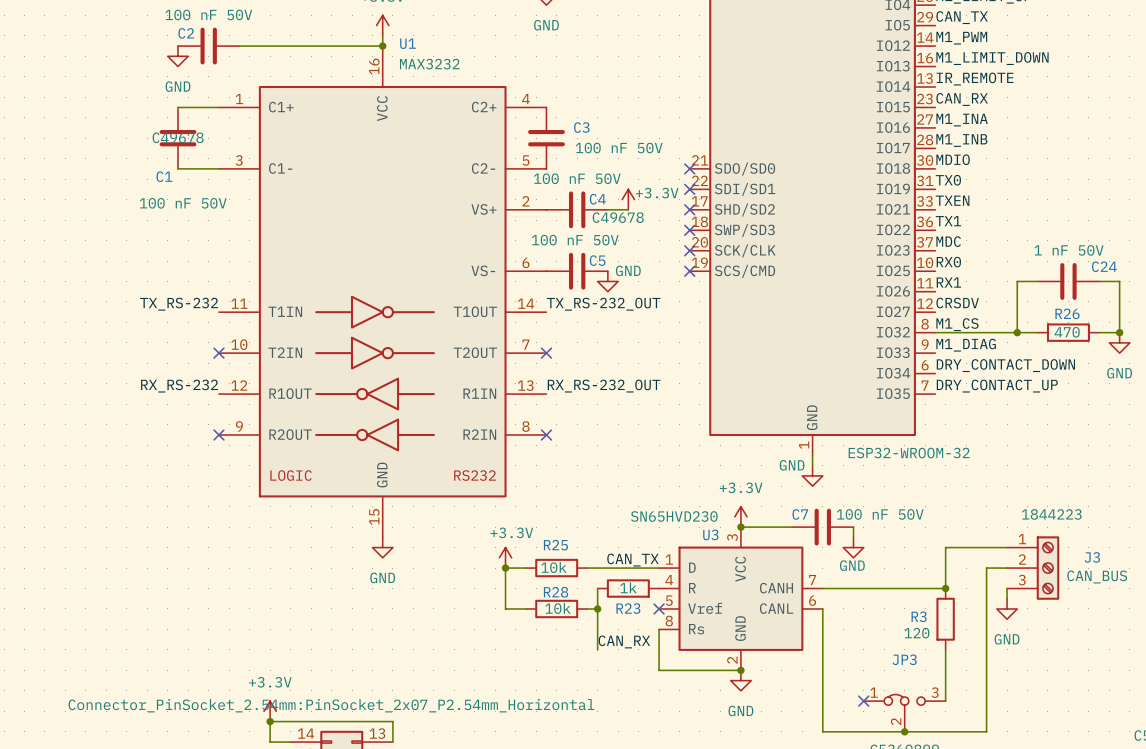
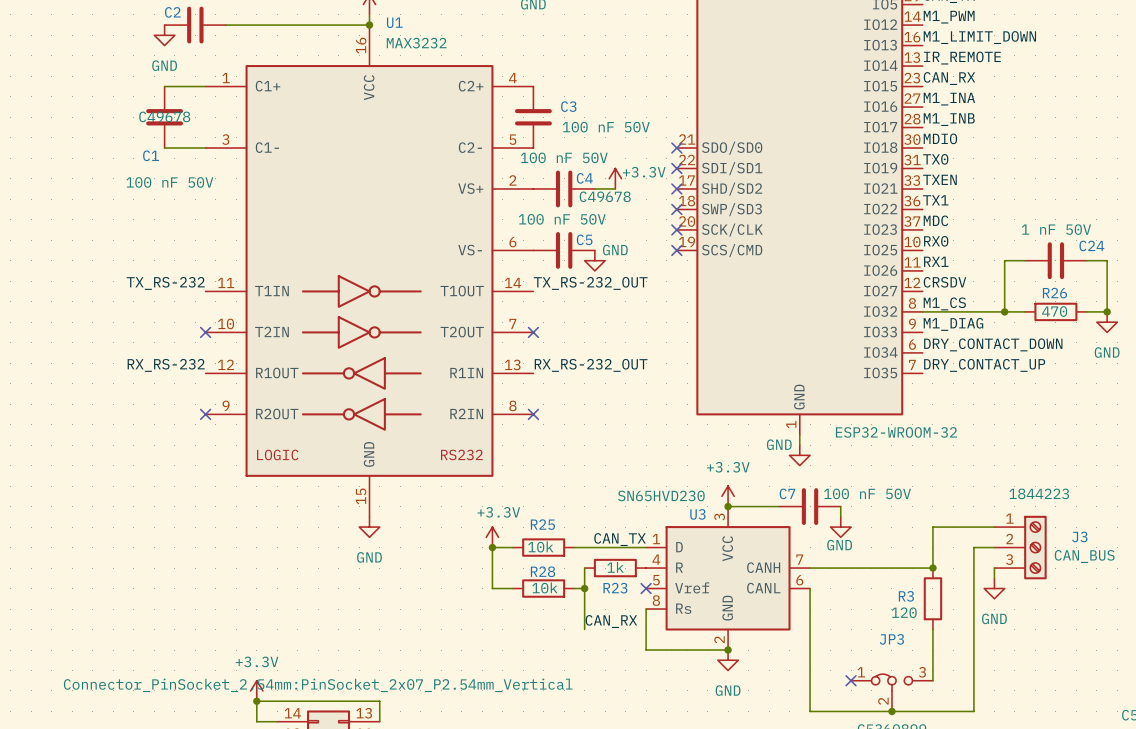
part text: Connector_PinSocket_2.54mm:PinSocket_2x07_P2.54mm_Horizontal (331, 705) -> Connector_PinSocket_2.54mm:PinSocket_2x07_P2.54mm_Vertical (318, 685)

